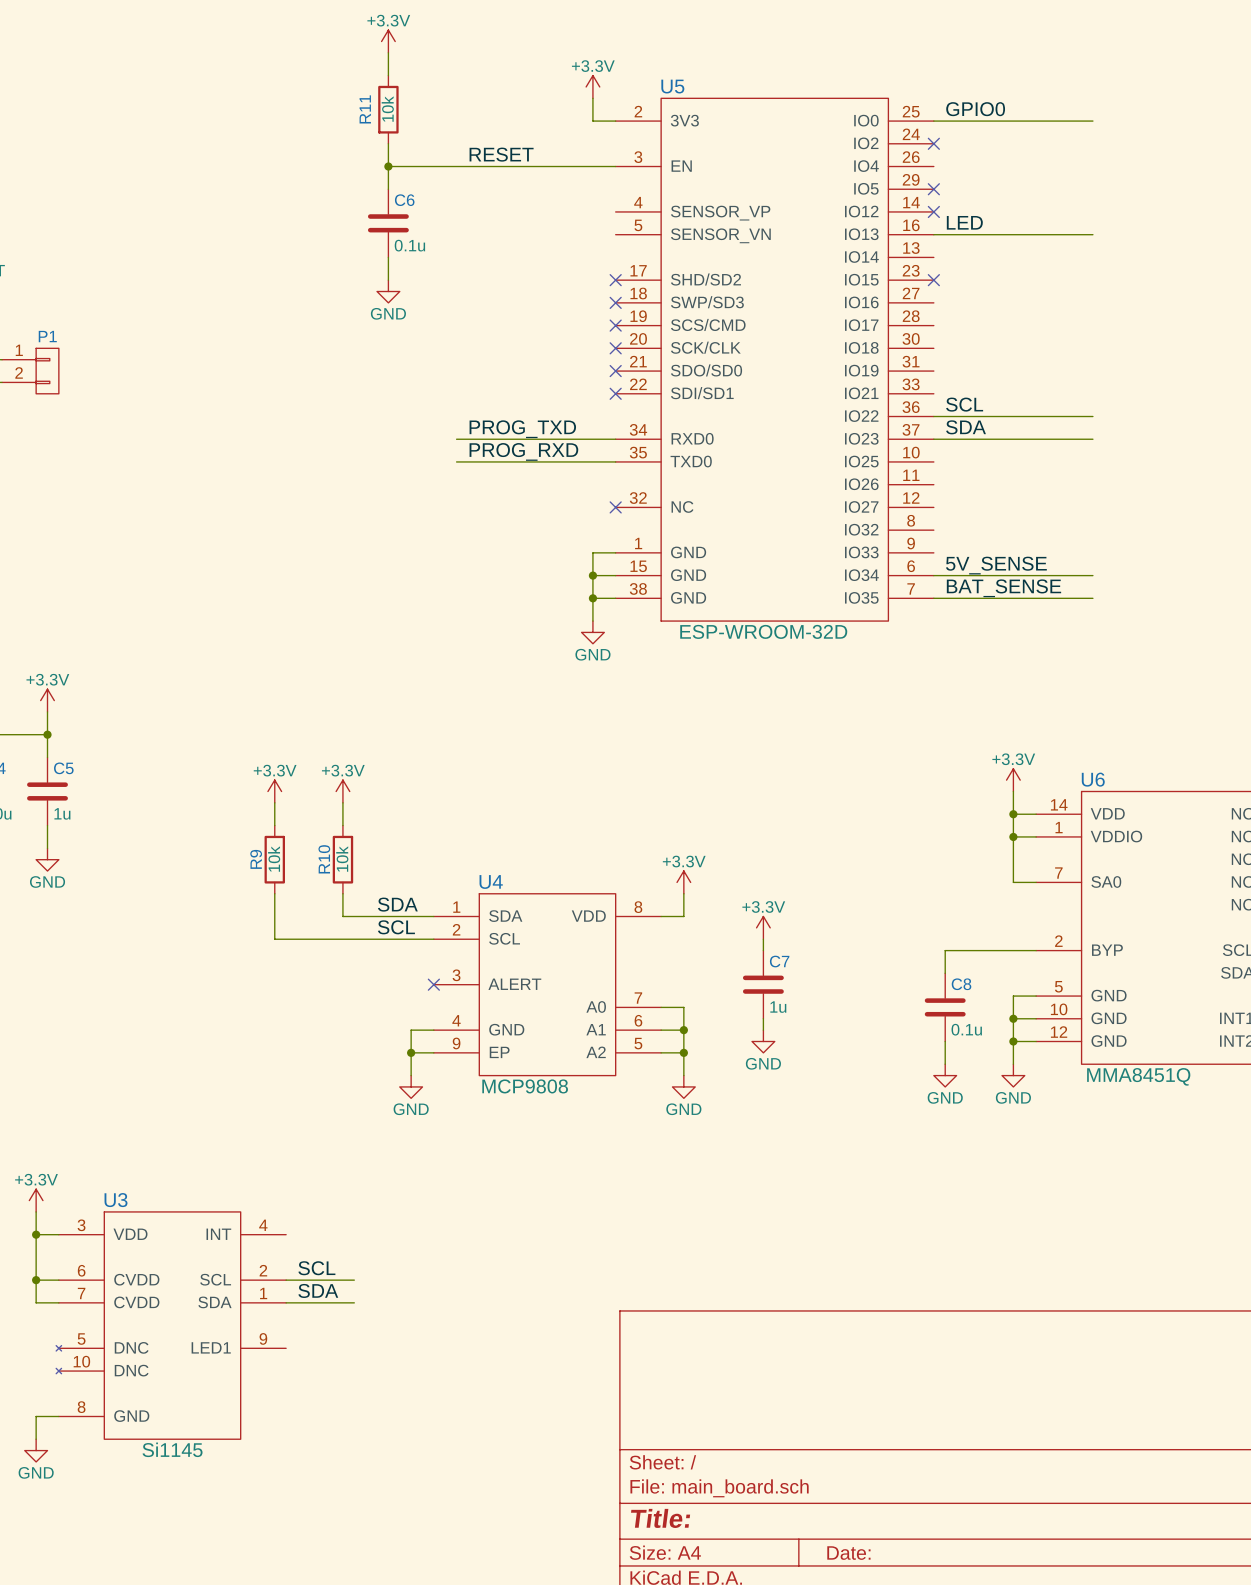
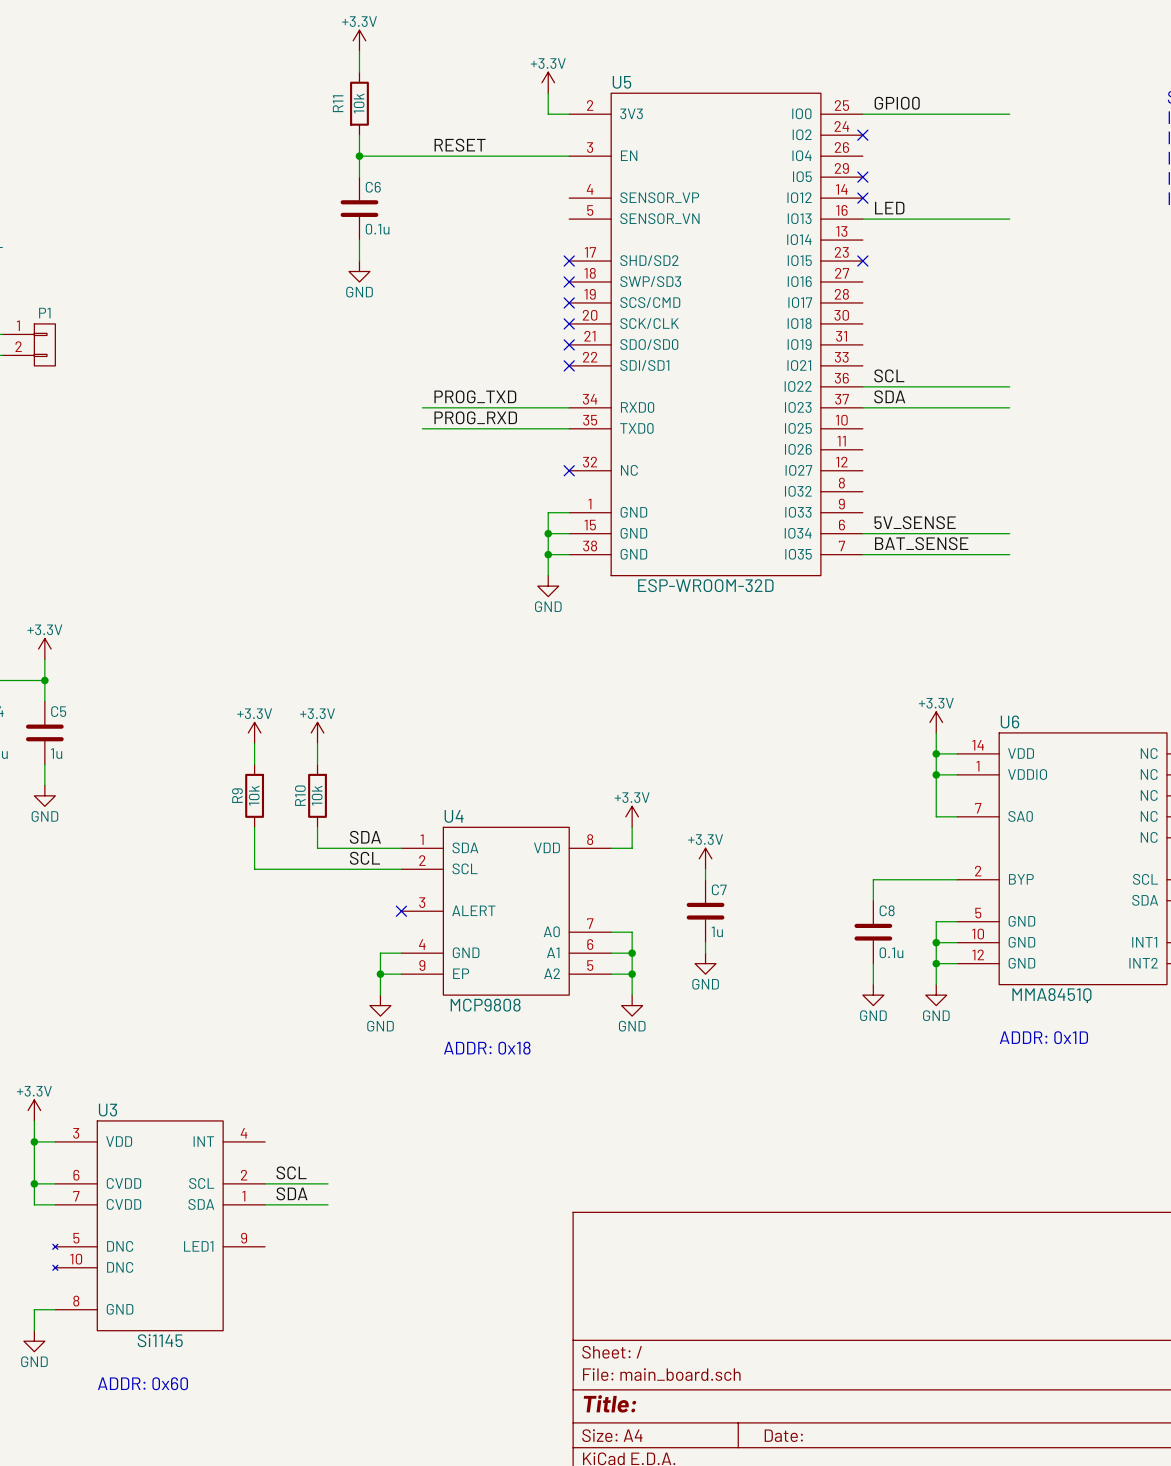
text: none -> ADDR: 0x1D (1043, 1037)
text: none -> ADDR: 0x18 (487, 1048)
text: none -> ADDR: 0x60 (142, 1383)

